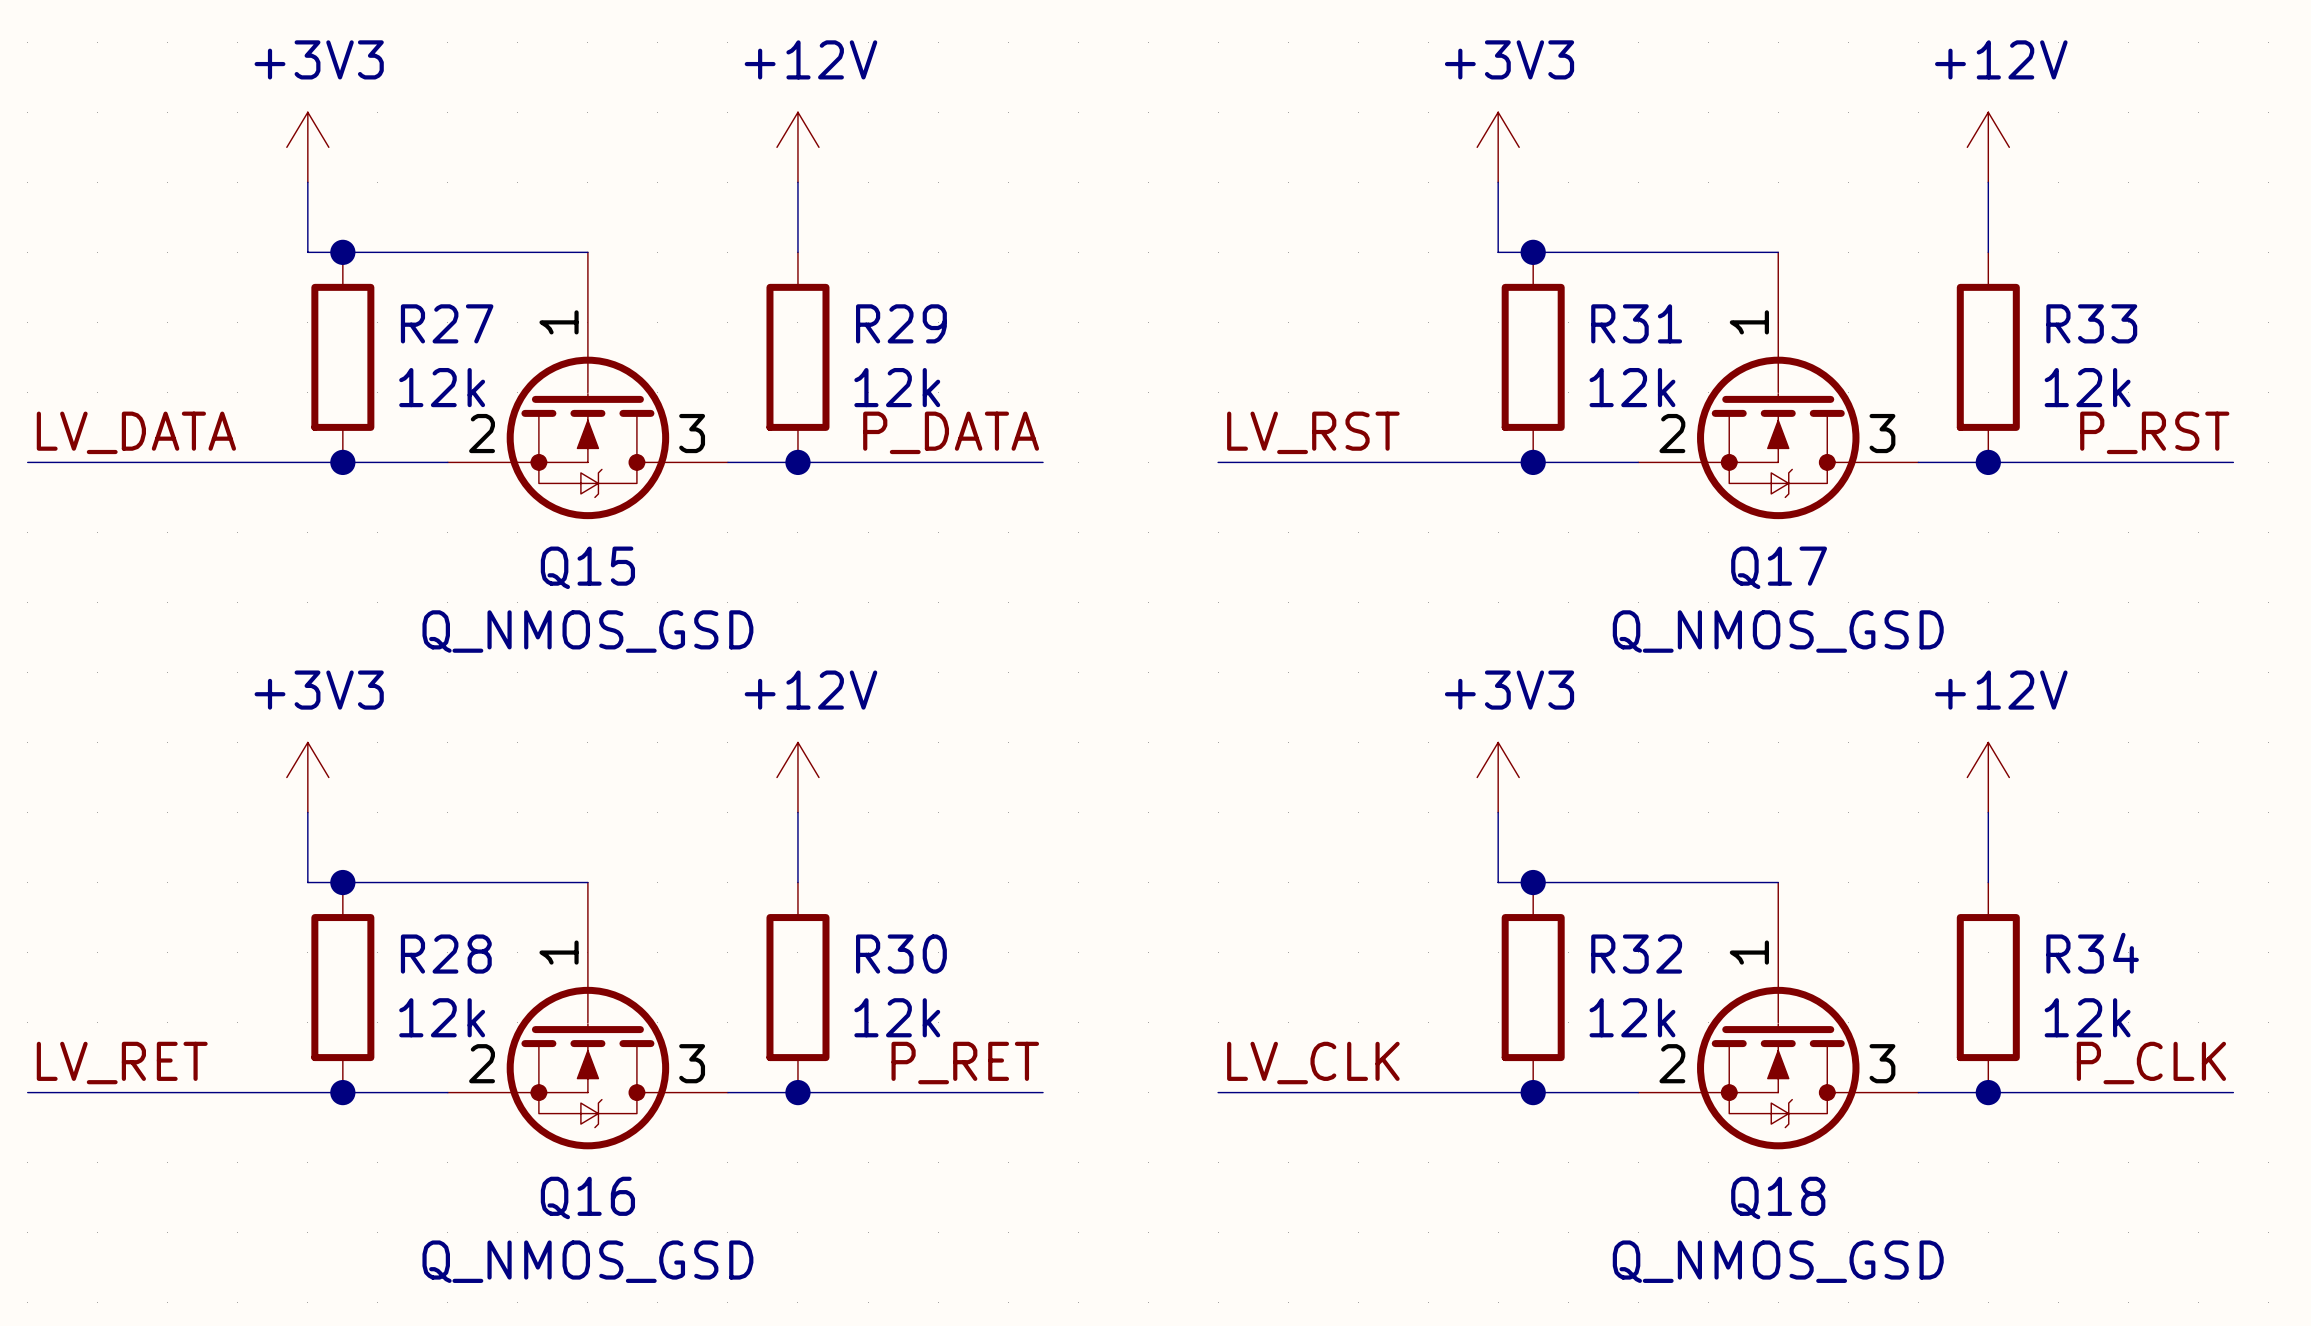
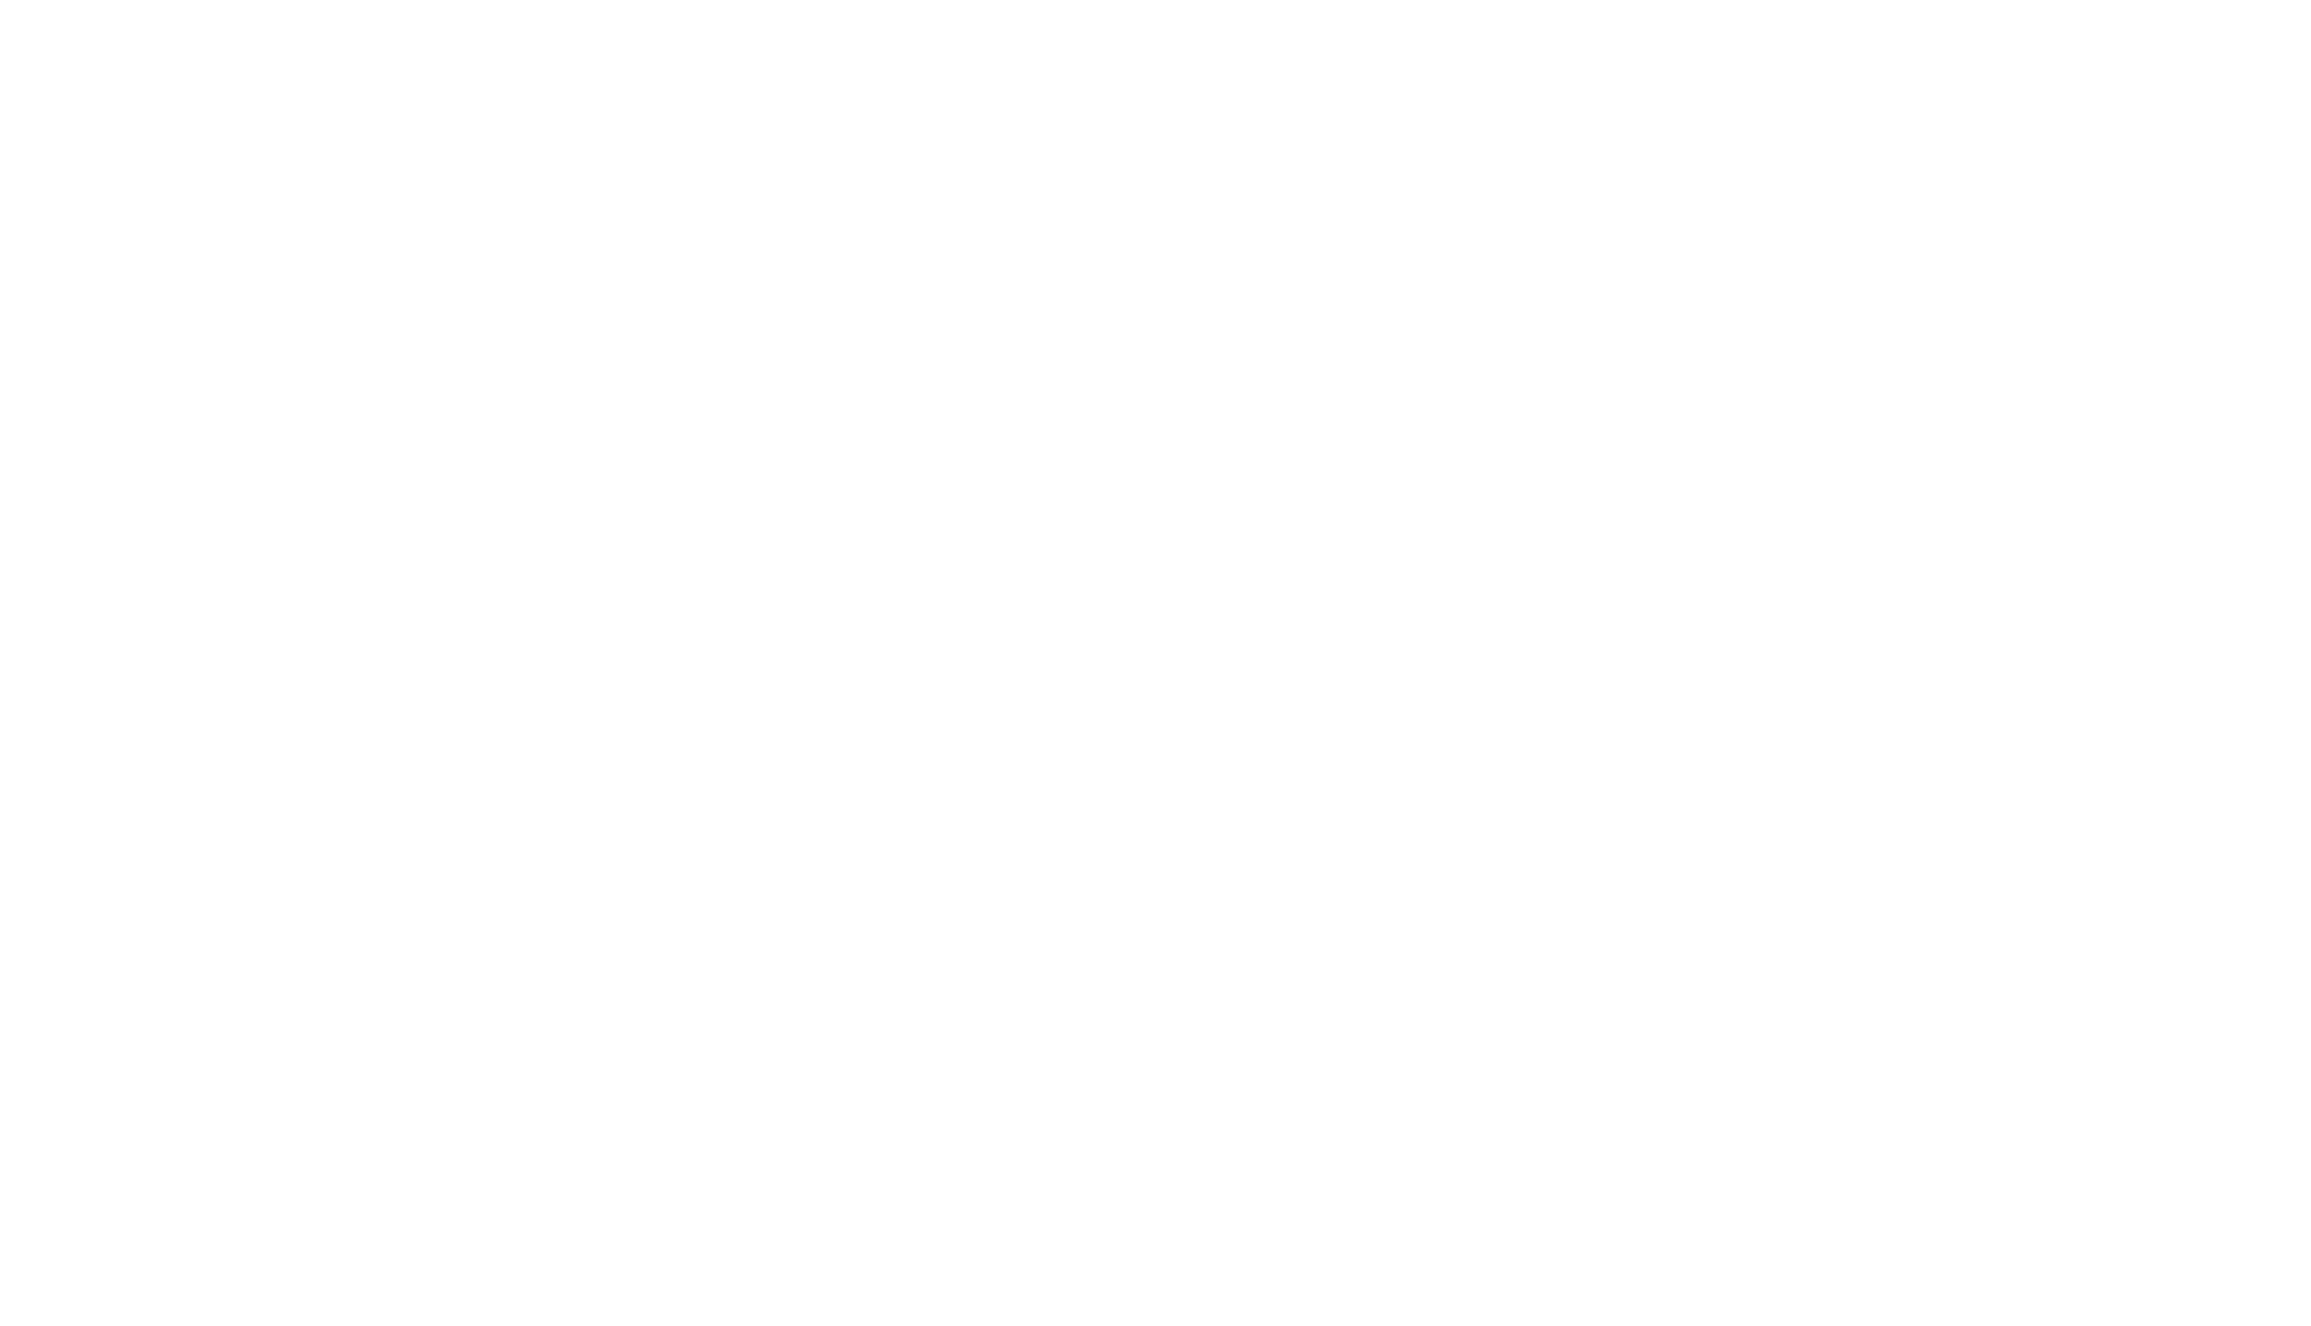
power symbol: +3V3 (307, 147) -> none
power symbol: +12V (797, 147) -> none
power symbol: +3V3 (1498, 147) -> none
power symbol: +12V (1988, 147) -> none
wire: (307, 182) (307, 252) (587, 252) -> none
wire: (797, 182) (797, 252) -> none
wire: (1498, 182) (1498, 252) (1778, 252) -> none
wire: (1988, 182) (1988, 252) -> none
junction: (342, 252) -> none
junction: (1533, 252) -> none
R27: 12k (342, 357) -> none
R29: 12k (797, 357) -> none
R31: 12k (1533, 357) -> none
R33: 12k (1988, 357) -> none
Q15: Q_NMOS_GSD (587, 385) -> none
Q17: Q_NMOS_GSD (1778, 385) -> none
label: LV_DATA (136, 432) -> none
label: P_DATA (951, 432) -> none
label: LV_RST (1313, 432) -> none
label: P_RST (2154, 432) -> none
wire: (27, 462) (447, 462) -> none
junction: (342, 462) -> none
wire: (727, 462) (1043, 462) -> none
junction: (797, 462) -> none
wire: (1218, 462) (1638, 462) -> none
junction: (1533, 462) -> none
wire: (1918, 462) (2233, 462) -> none
junction: (1988, 462) -> none
power symbol: +3V3 (307, 777) -> none
power symbol: +12V (797, 777) -> none
power symbol: +3V3 (1498, 777) -> none
power symbol: +12V (1988, 777) -> none
wire: (307, 812) (307, 882) (587, 882) -> none
wire: (797, 812) (797, 882) -> none
wire: (1498, 812) (1498, 882) (1778, 882) -> none
wire: (1988, 812) (1988, 882) -> none
junction: (342, 882) -> none
junction: (1533, 882) -> none
R28: 12k (342, 987) -> none
R30: 12k (797, 987) -> none
R32: 12k (1533, 987) -> none
R34: 12k (1988, 987) -> none
Q16: Q_NMOS_GSD (587, 1015) -> none
Q18: Q_NMOS_GSD (1778, 1015) -> none
label: LV_RET (122, 1063) -> none
label: P_RET (965, 1063) -> none
label: LV_CLK (1313, 1063) -> none
label: P_CLK (2151, 1063) -> none
wire: (27, 1092) (447, 1092) -> none
junction: (342, 1092) -> none
wire: (727, 1092) (1043, 1092) -> none
junction: (797, 1092) -> none
wire: (1218, 1092) (1638, 1092) -> none
junction: (1533, 1092) -> none
wire: (1918, 1092) (2233, 1092) -> none
junction: (1988, 1092) -> none

